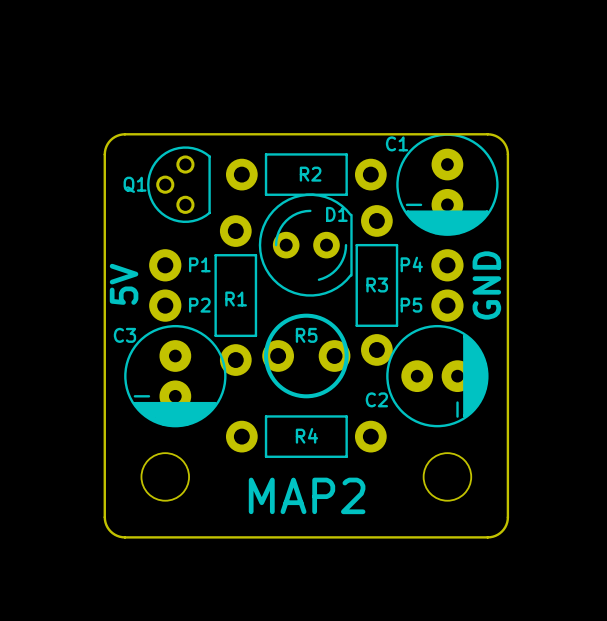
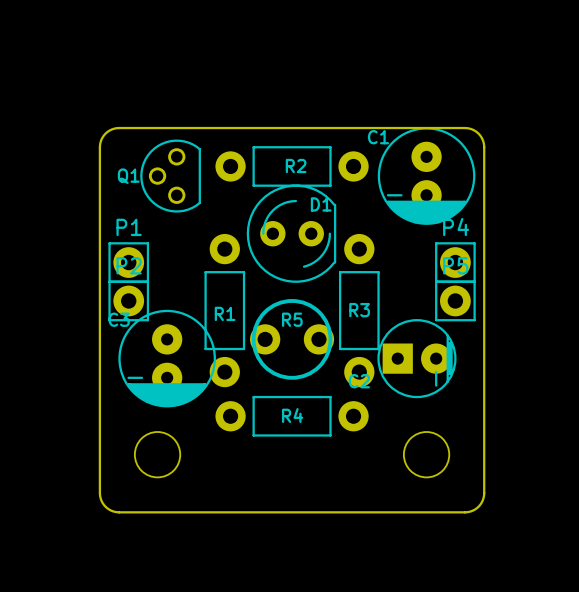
P1 side: bottom (165, 265) -> top (128, 262)
P4 side: bottom (447, 265) -> top (455, 262)
text: 5V (124, 284) -> none
R3 position: (376, 285) -> (359, 310)
text: GND (486, 285) -> none
R1 position: (235, 295) -> (224, 310)
P2 side: bottom (165, 305) -> top (128, 300)
P5 side: bottom (447, 305) -> top (455, 300)
C2 footprint: [386, 324, 489, 428] -> [377, 319, 457, 399]
text: MAP2 (307, 495) -> none

